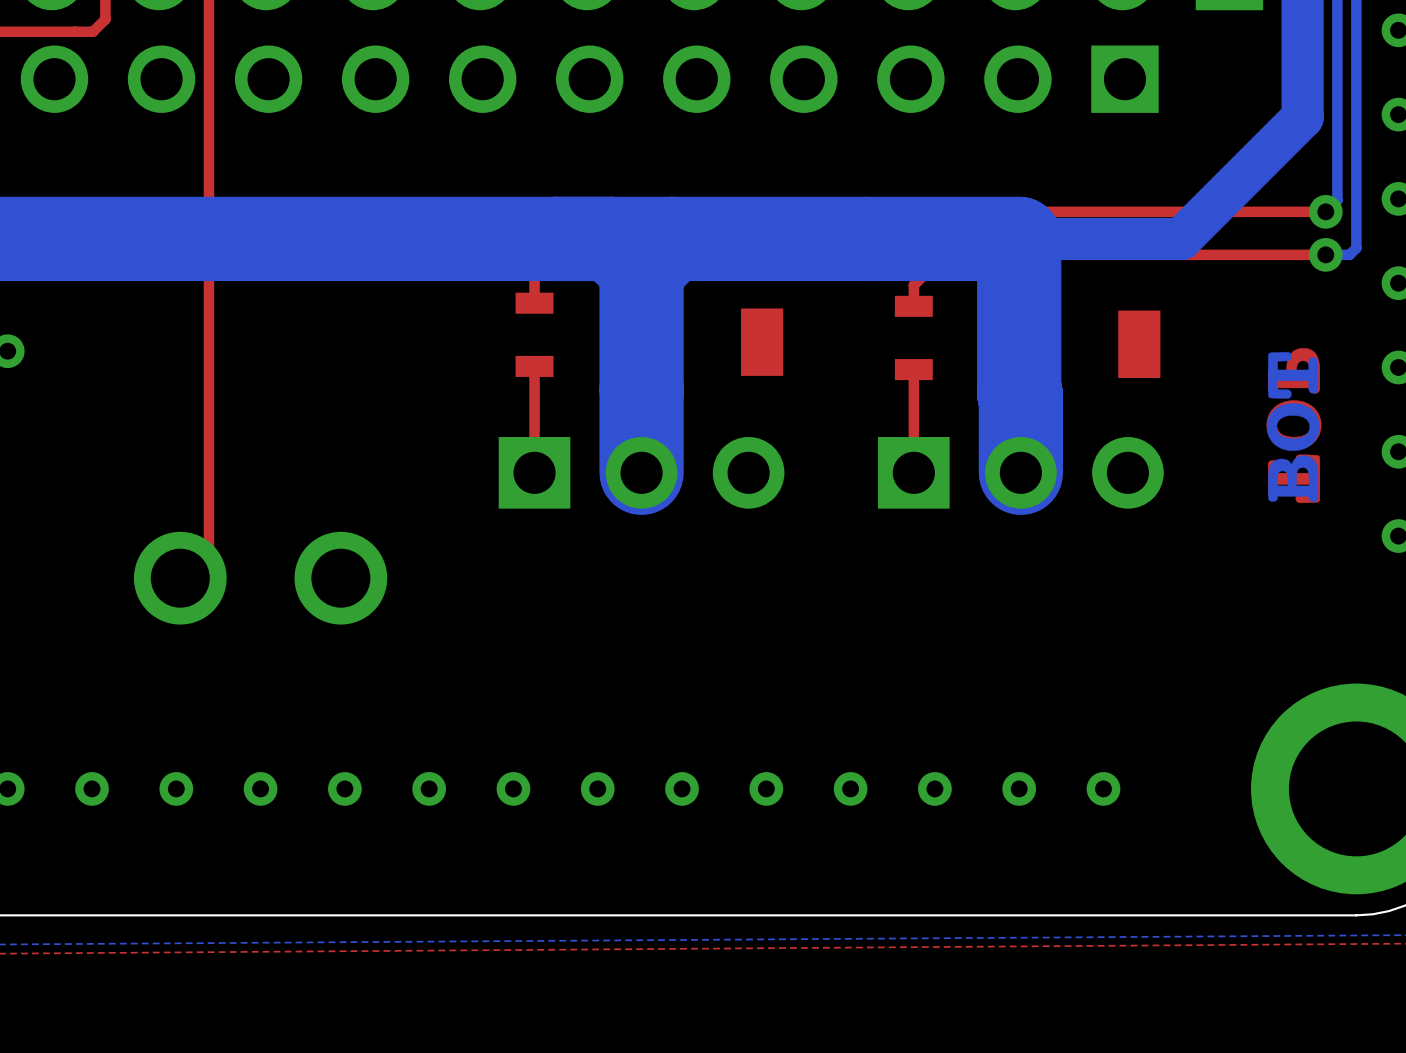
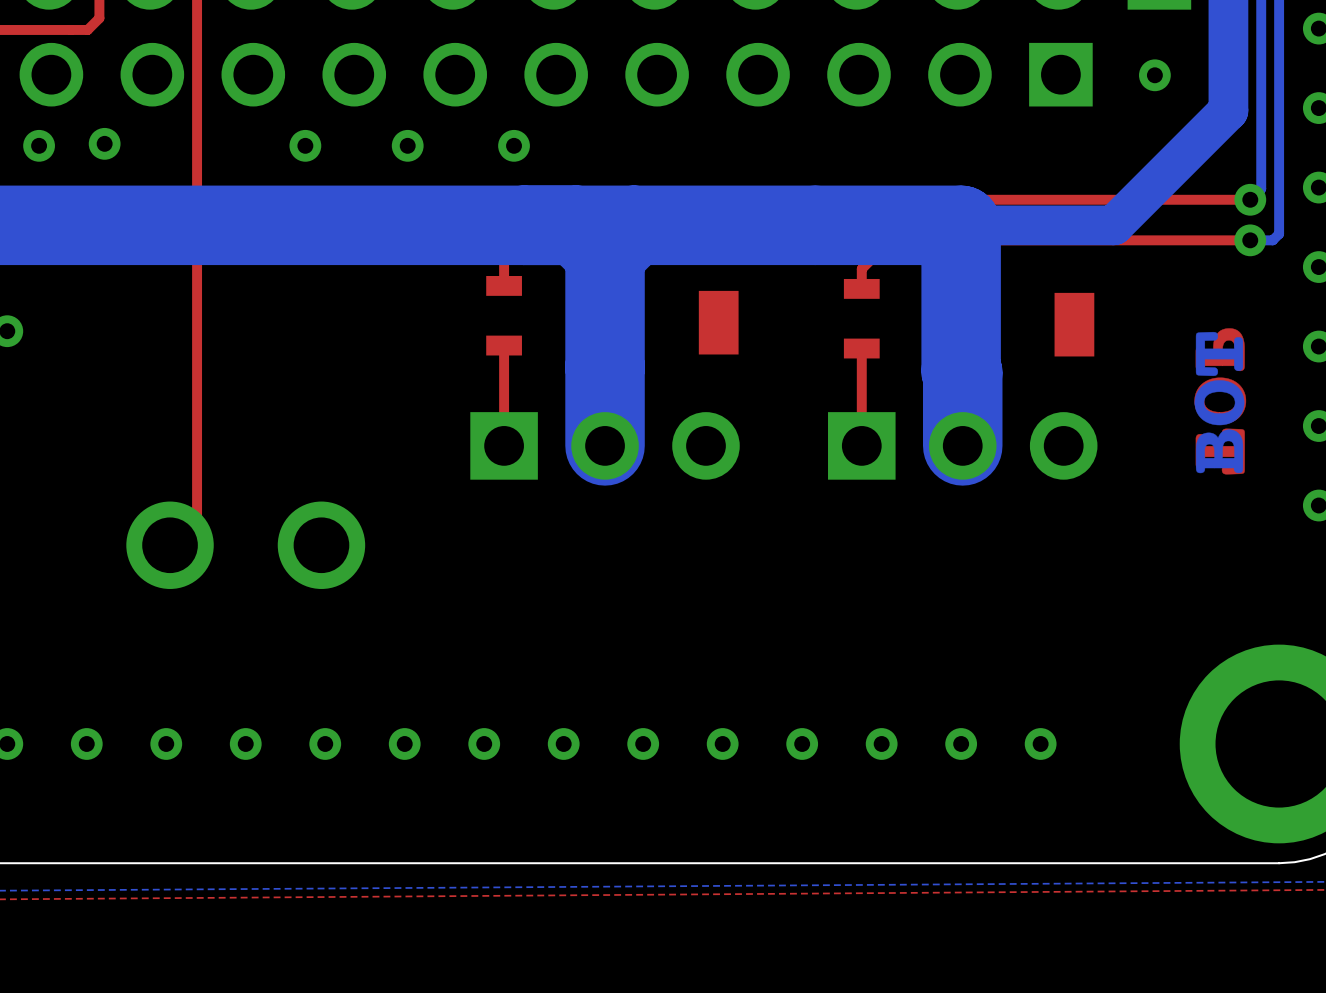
via: none -> (1154, 75)
via: none -> (104, 143)
via: none -> (39, 145)
via: none -> (305, 145)
via: none -> (407, 145)
via: none -> (514, 145)

